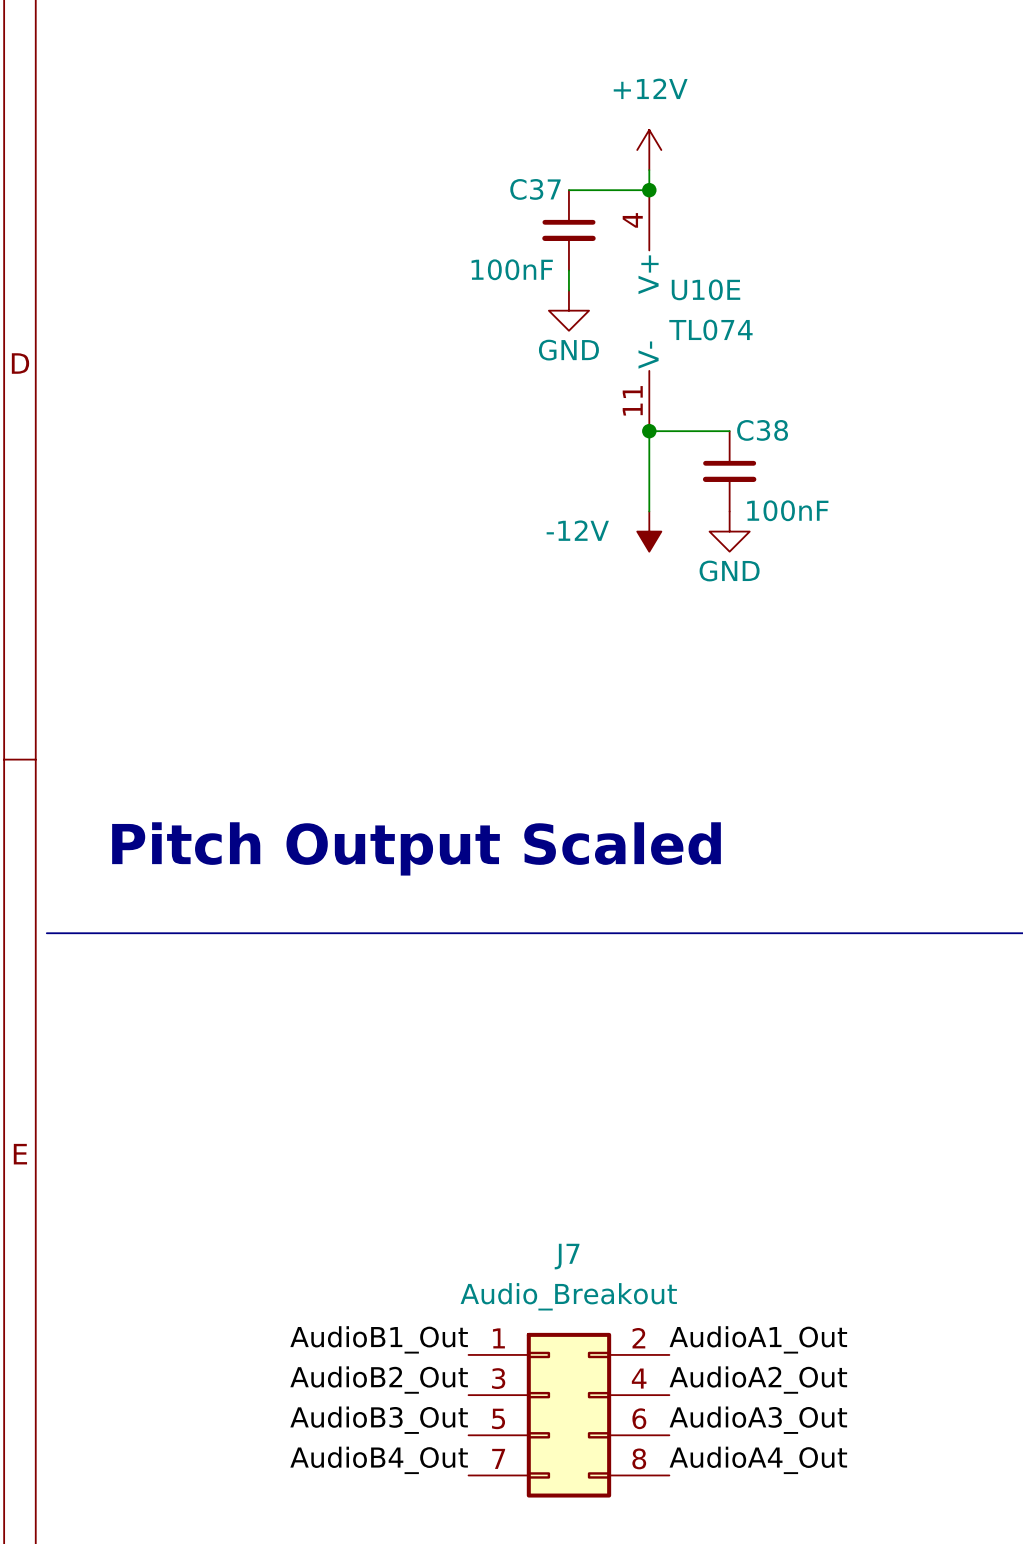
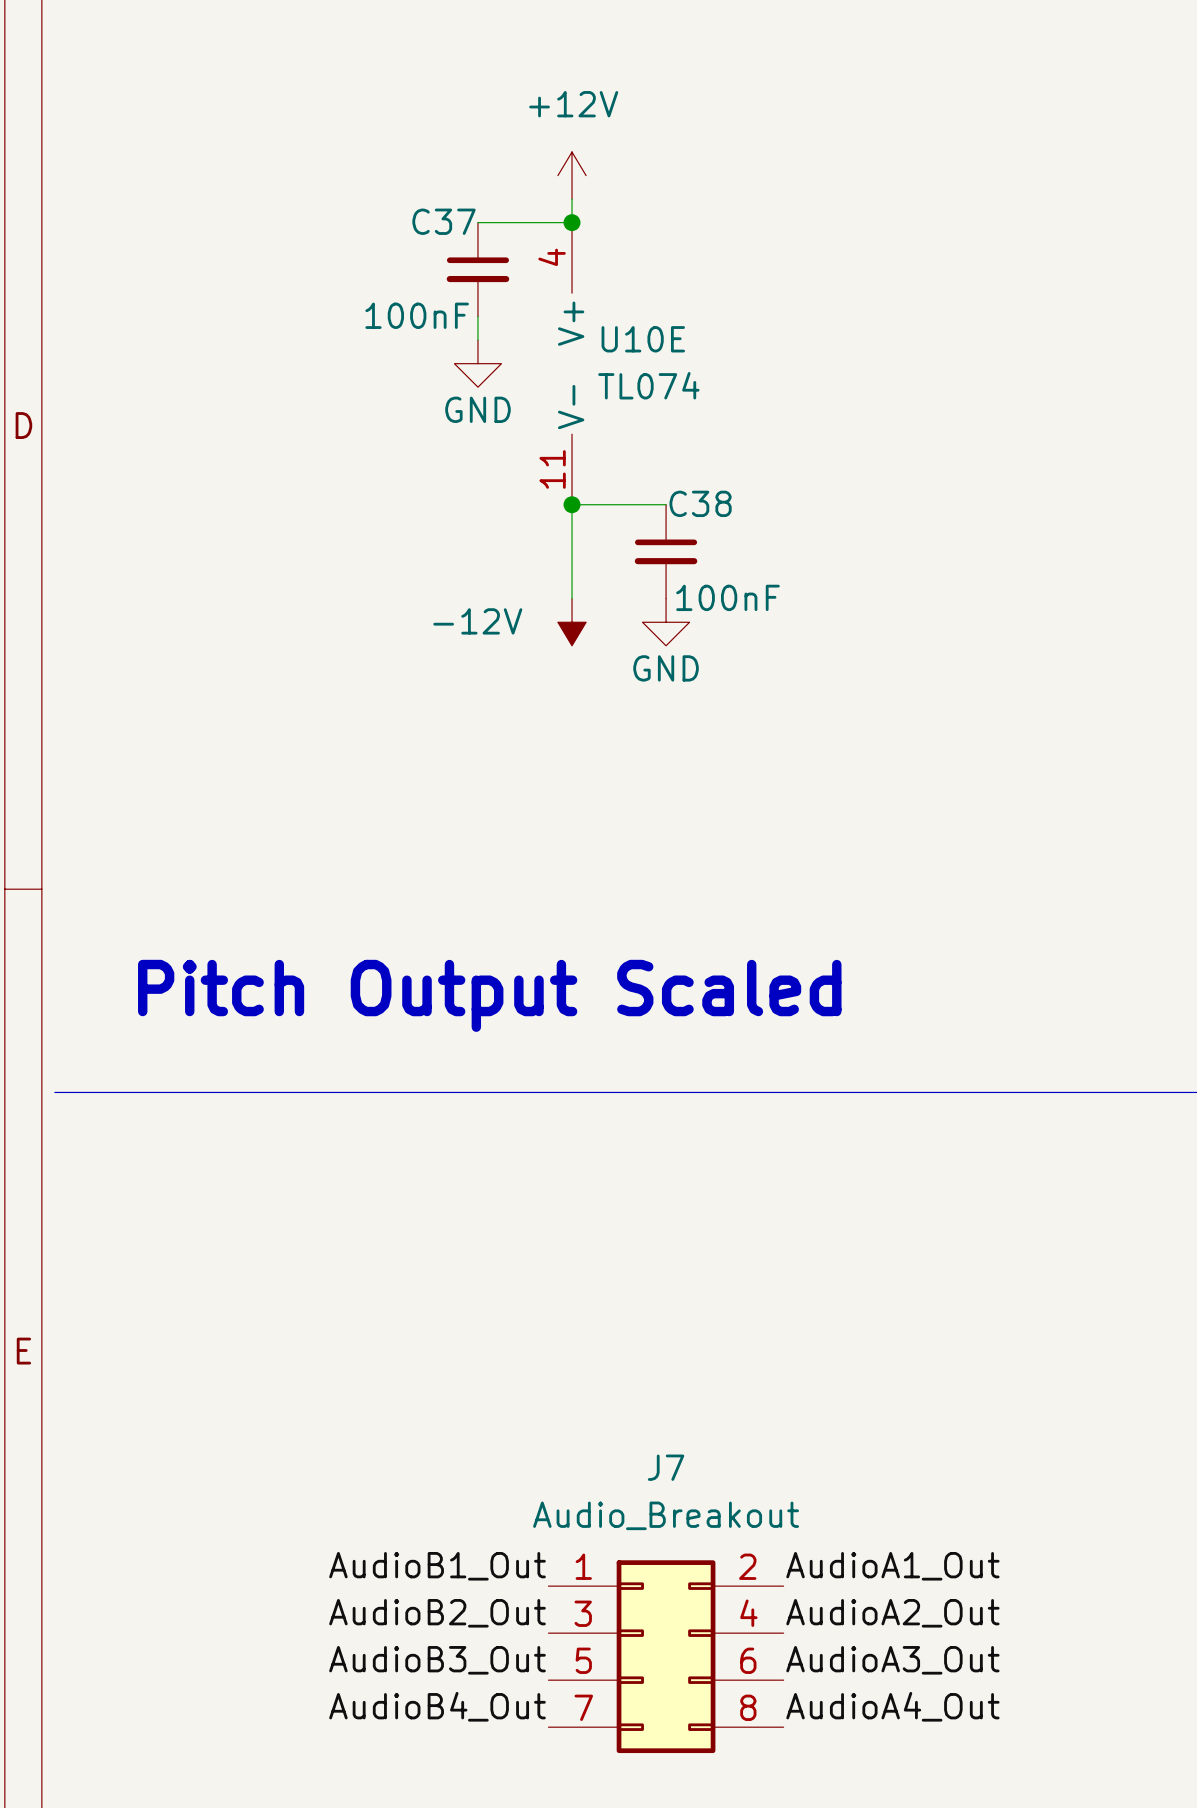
power symbol position: +12V (649, 150) -> +12V (572, 175)
wire: (649, 170) (649, 190) (568, 190) -> (572, 199) (572, 222) (477, 222)
junction: none -> (572, 222)
junction: (649, 190) -> none
C37 position: (568, 230) -> (477, 269)
wire: (568, 270) (568, 290) -> (477, 316) (477, 340)
power symbol: none -> GND (477, 363)
power symbol: GND (568, 310) -> none
U10E position: (649, 310) -> (572, 363)
junction: none -> (572, 504)
junction: (649, 431) -> none
wire: (729, 431) (649, 431) (649, 511) -> (666, 504) (572, 504) (572, 598)
C38 position: (729, 471) -> (666, 551)
power symbol: none -> GND (666, 622)
power symbol position: -12V (649, 531) -> -12V (572, 622)
power symbol: GND (729, 531) -> none

